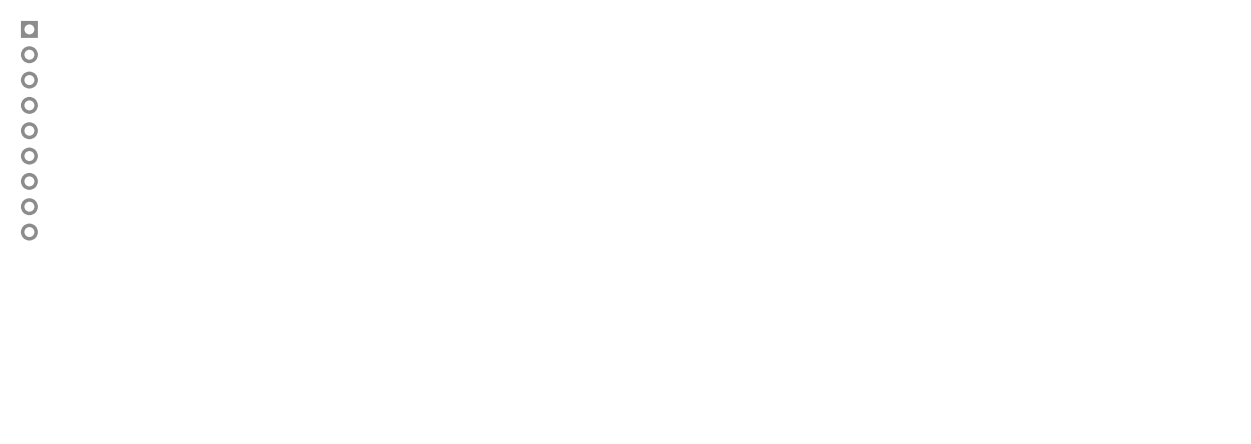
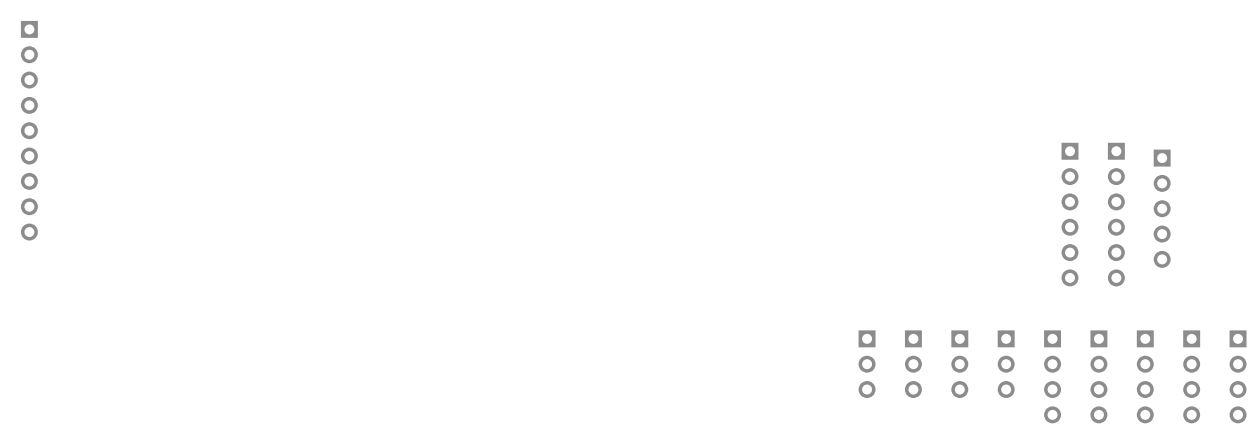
part: none -> (1162, 208)
part: none -> (1069, 214)
part: none -> (1116, 214)
part: none -> (867, 364)
part: none -> (913, 364)
part: none -> (959, 364)
part: none -> (1006, 364)
part: none -> (1052, 376)
part: none -> (1098, 376)
part: none -> (1145, 376)
part: none -> (1191, 376)
part: none -> (1238, 376)

